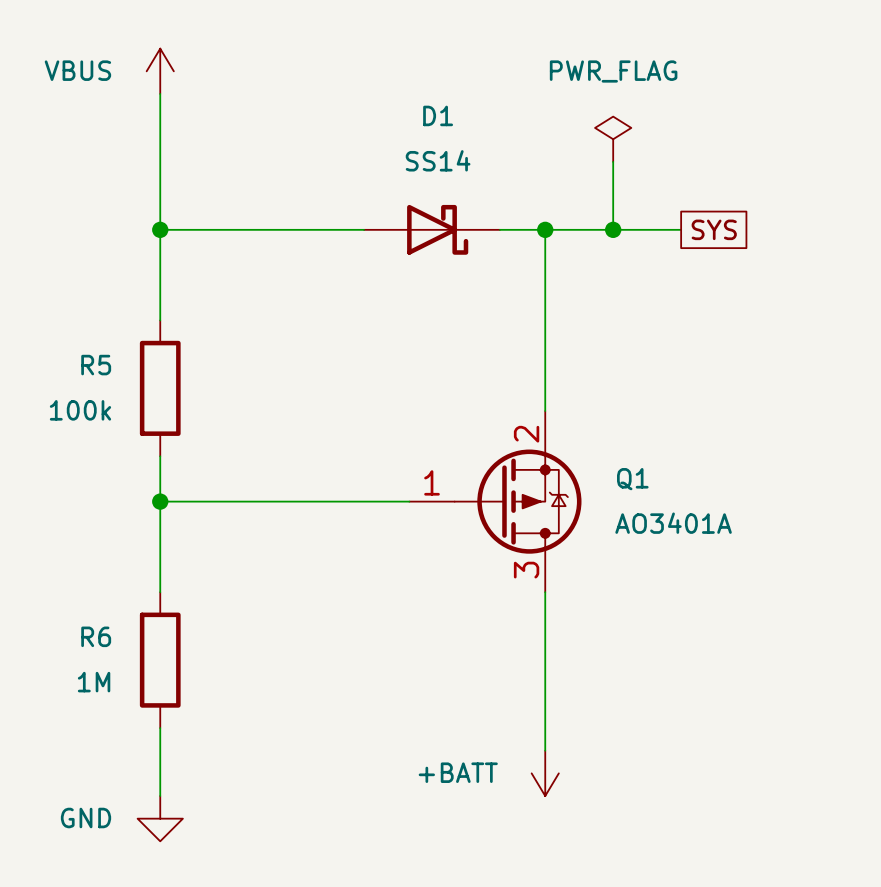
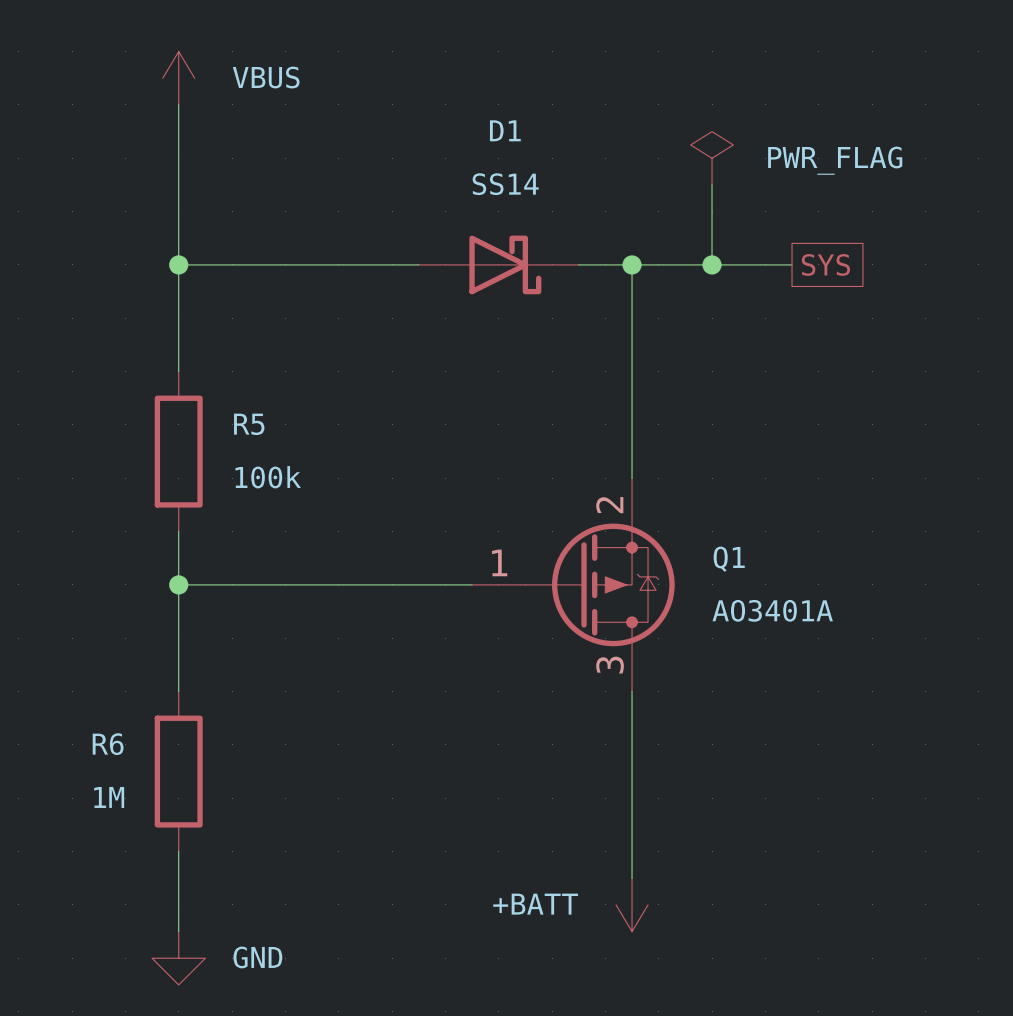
power symbol text position: VBUS (77, 70) -> VBUS (266, 77)
power symbol text position: PWR_FLAG (613, 71) -> PWR_FLAG (835, 160)
R5 name position: R5 (96, 365) -> R5 (249, 424)
R5 value position: 100k (80, 410) -> 100k (268, 477)
power symbol text position: GND (85, 818) -> GND (257, 957)

